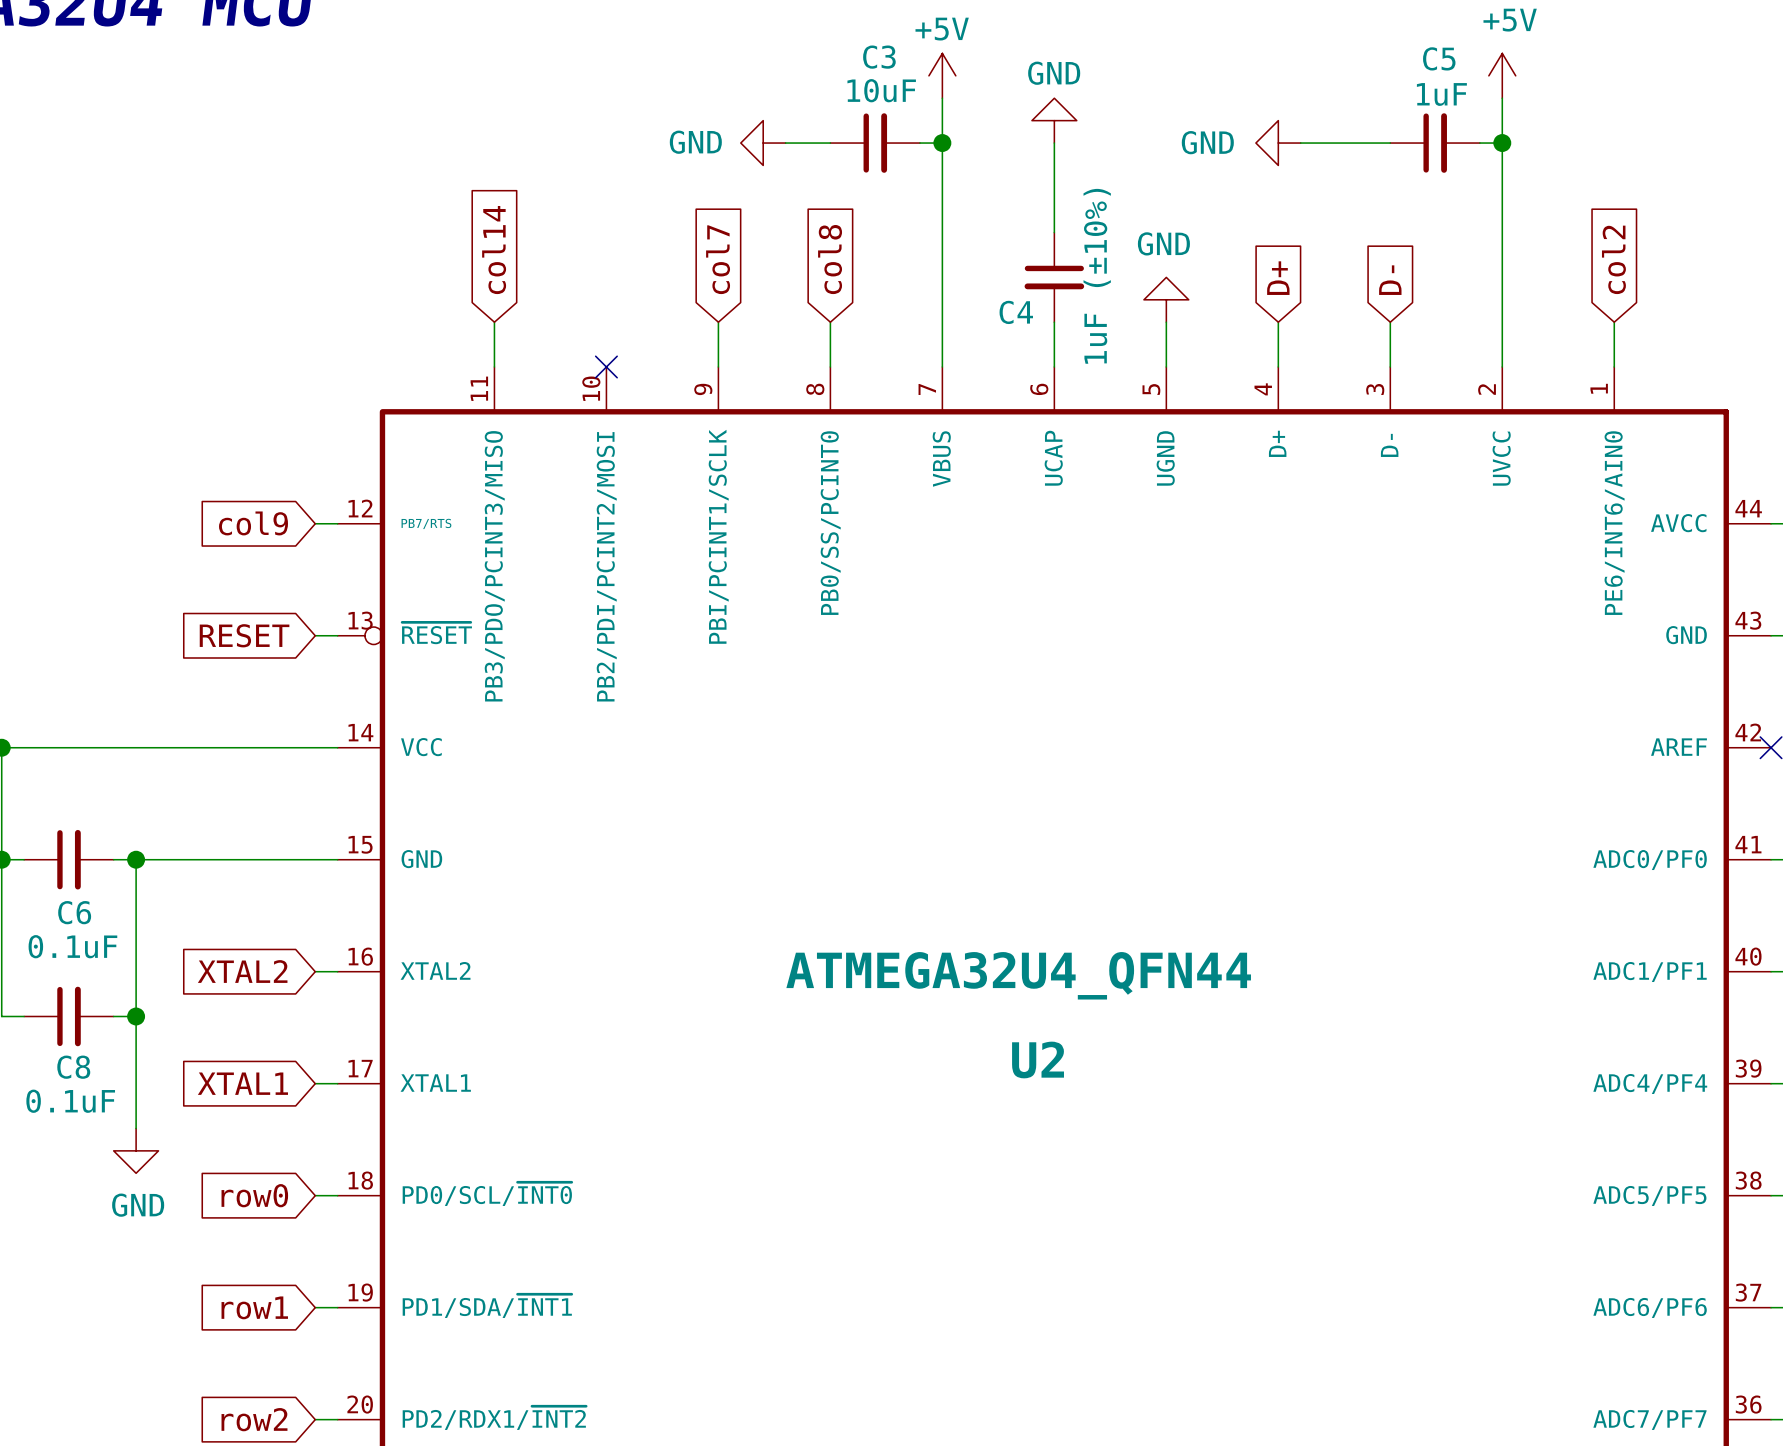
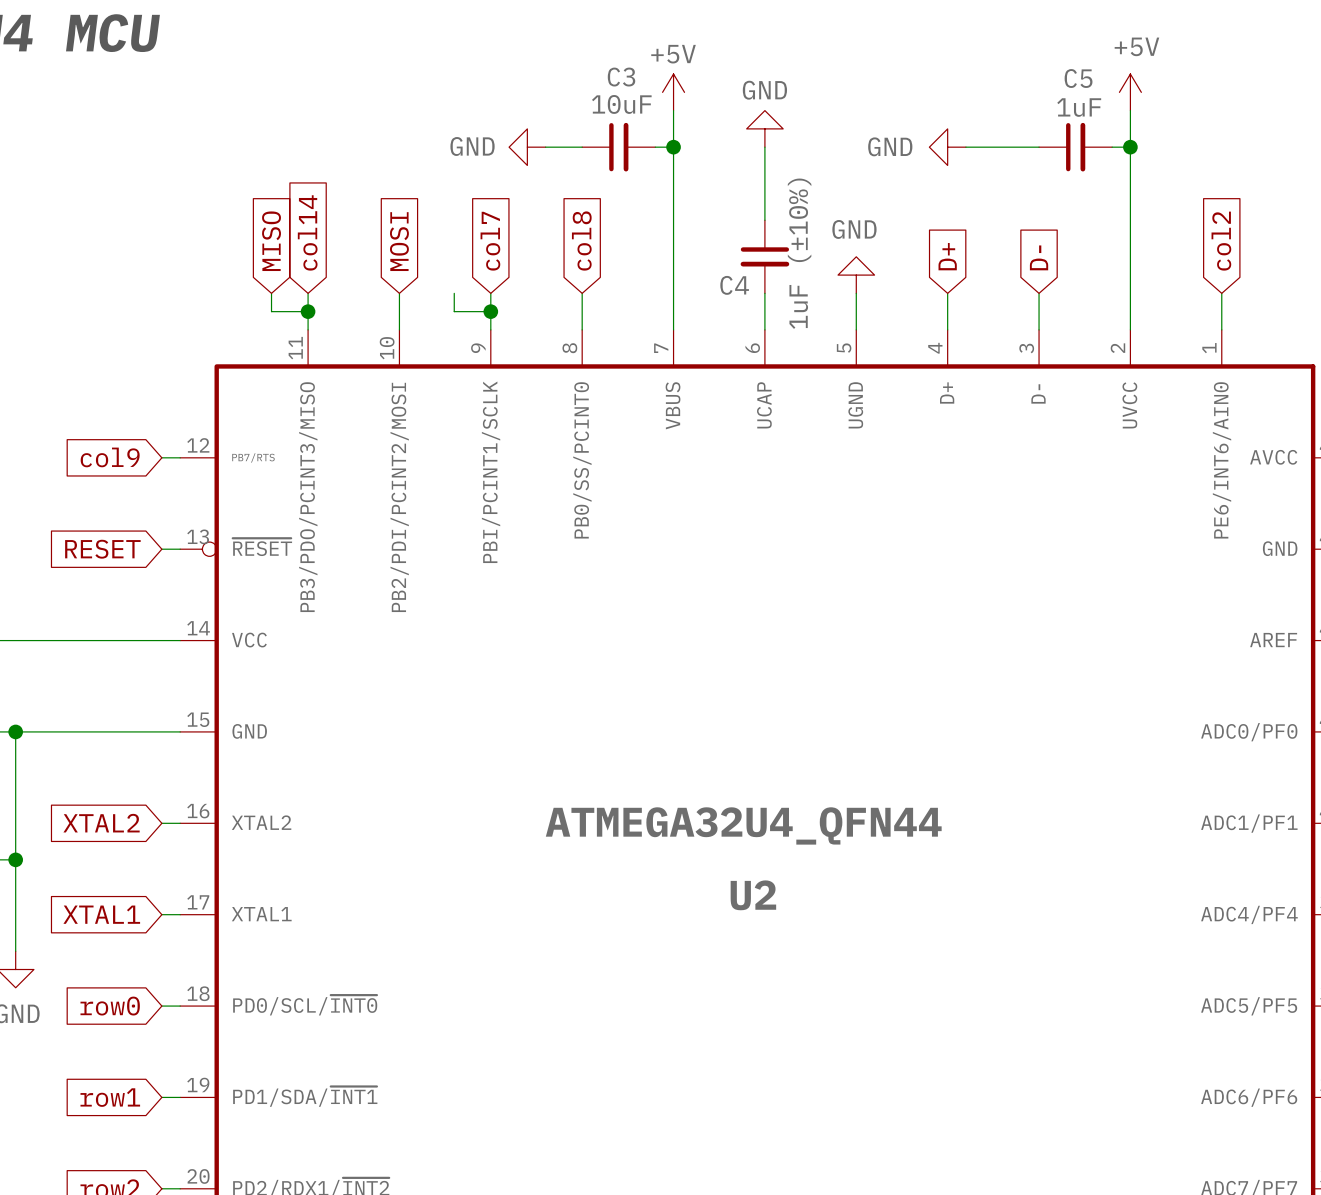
global label: none -> MISO (271, 241)
global label: none -> MOSI (399, 241)
wire: none -> (271, 293) (271, 311) (308, 311)
wire: none -> (399, 293) (399, 329)
wire: none -> (454, 293) (454, 311) (490, 311)
junction: none -> (308, 311)
junction: none -> (490, 311)
no-connect mark: (606, 366) -> none

